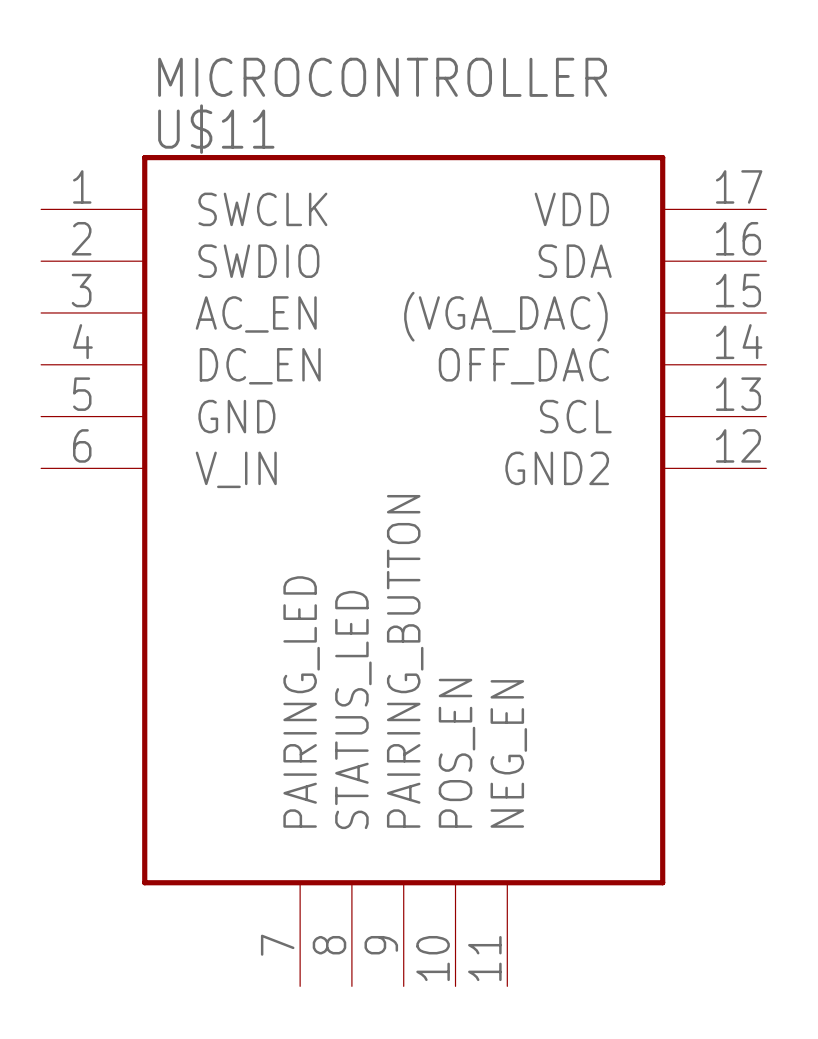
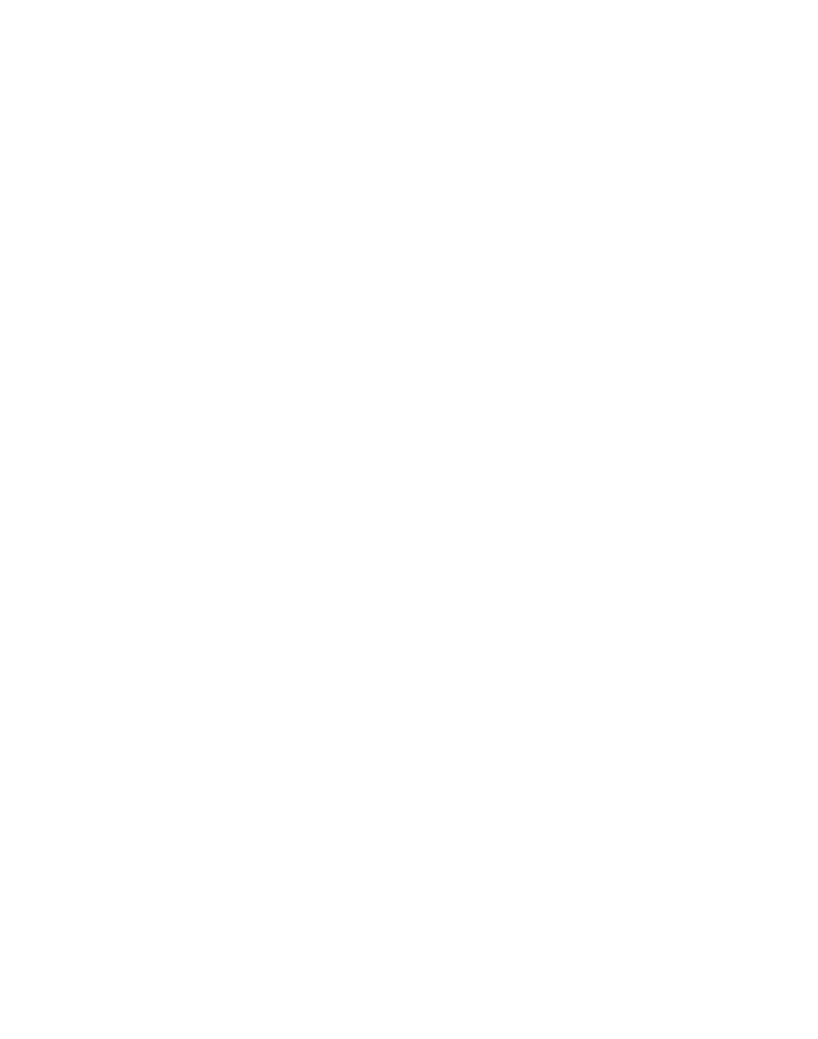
U$11: MICROCONTROLLER (403, 570) -> none

